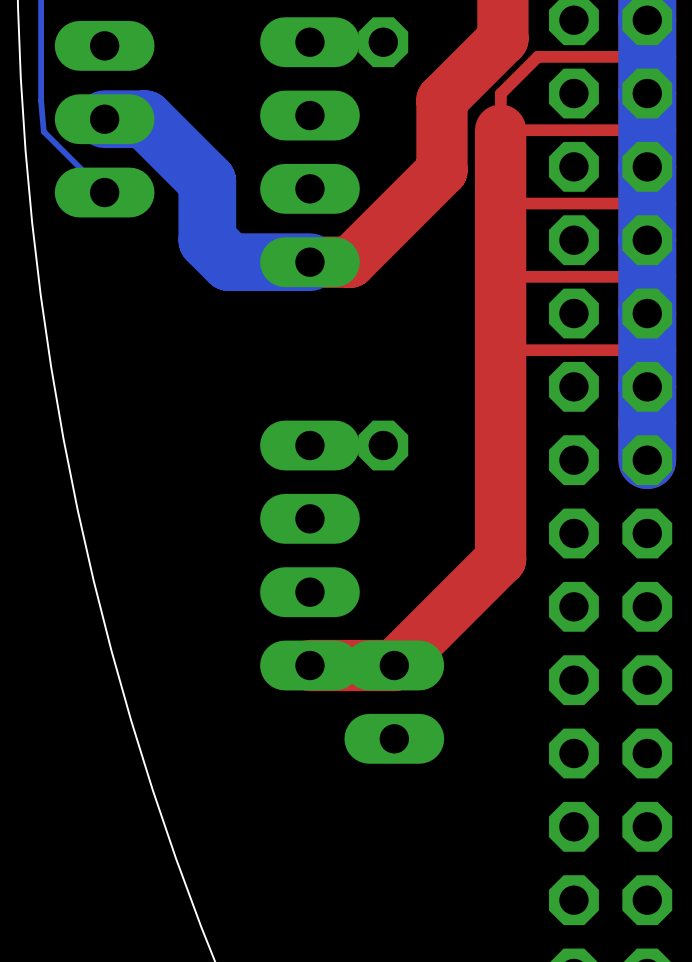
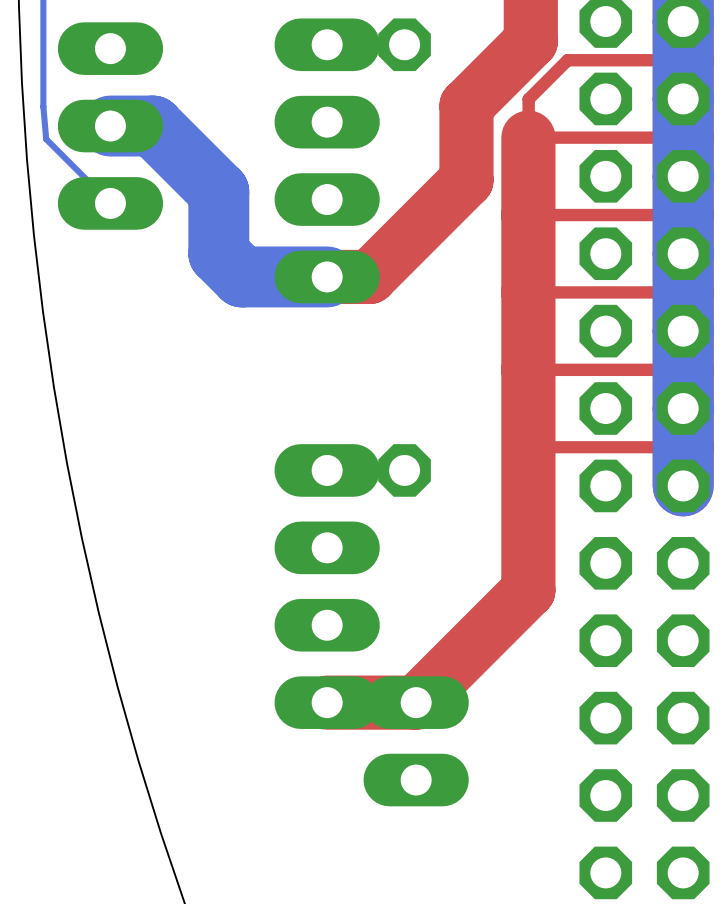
top track: none -> (683, 447) (555, 447)

